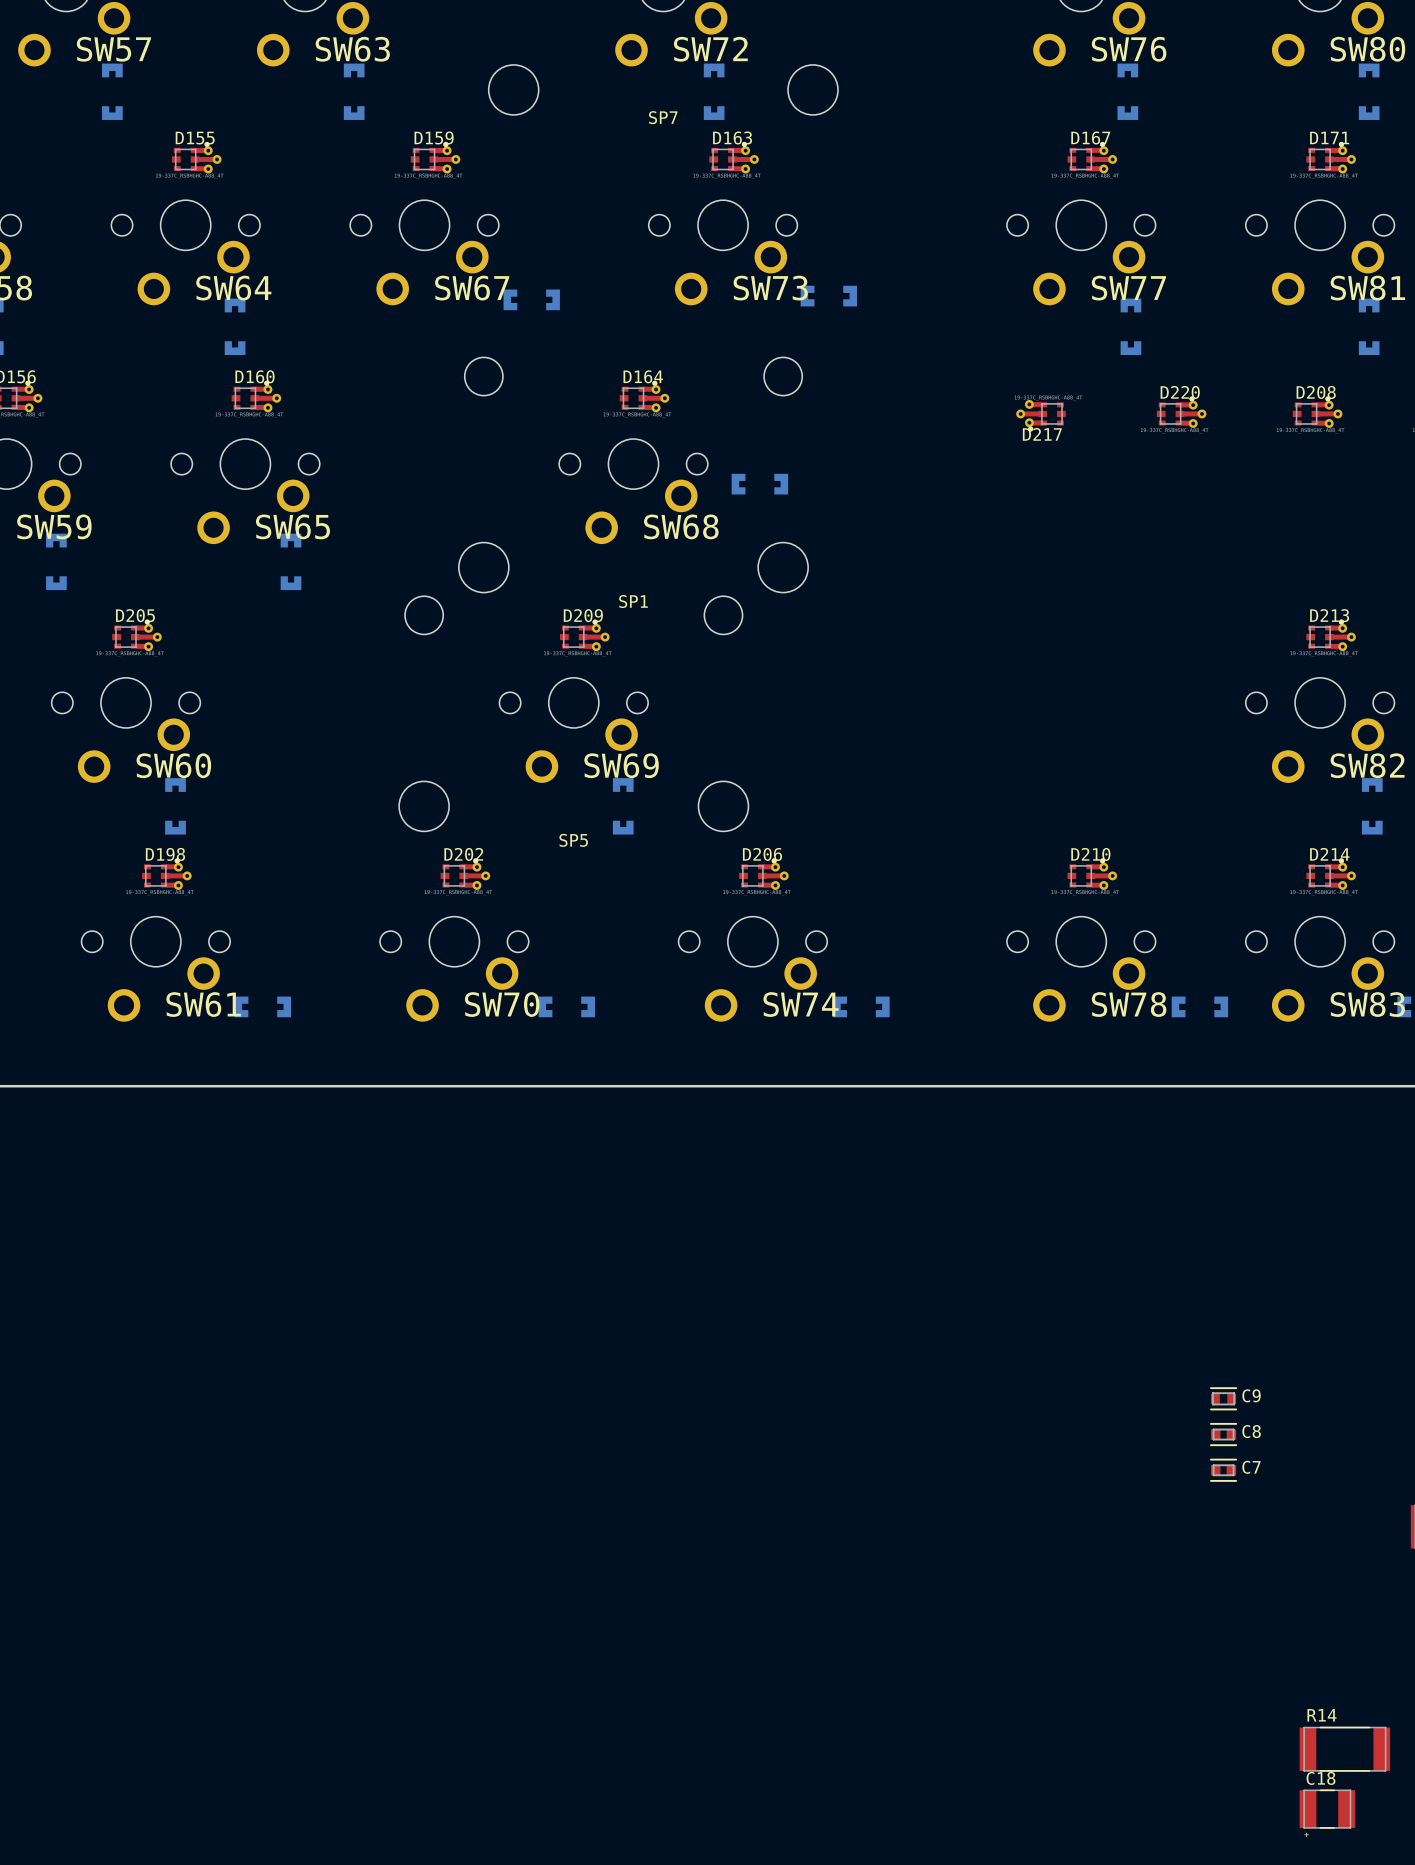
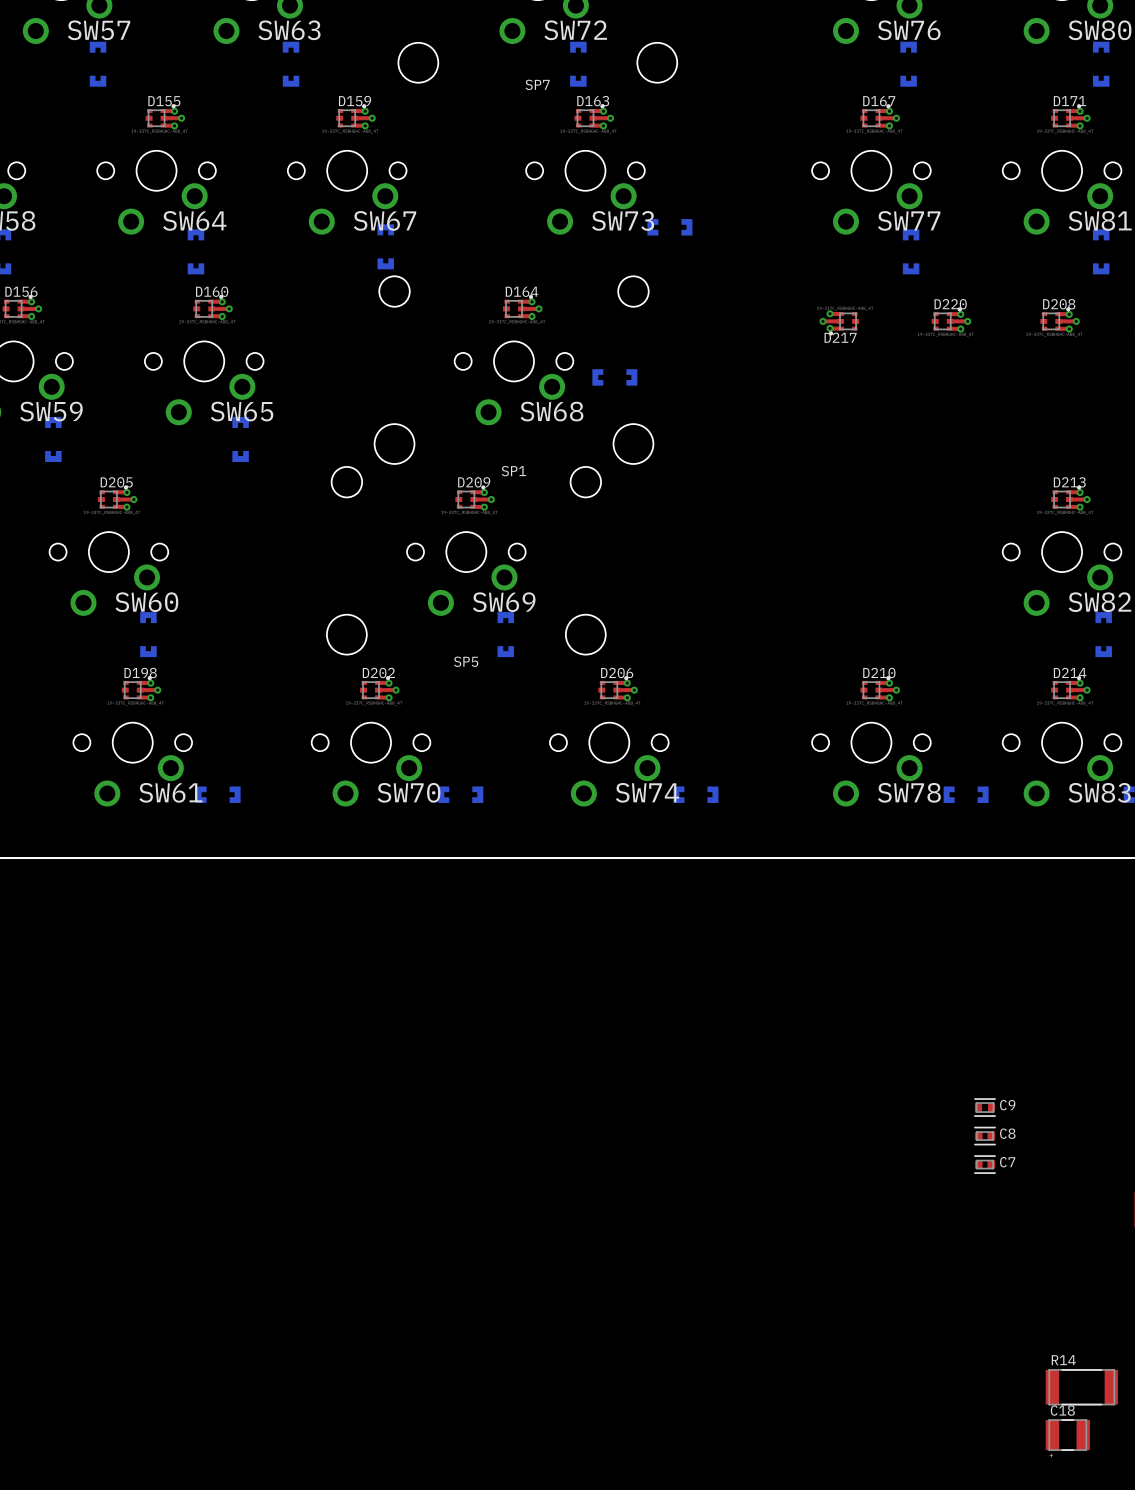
part rotation: 0° (531, 299) -> 90° clockwise (385, 246)
part position: (531, 299) -> (385, 246)

